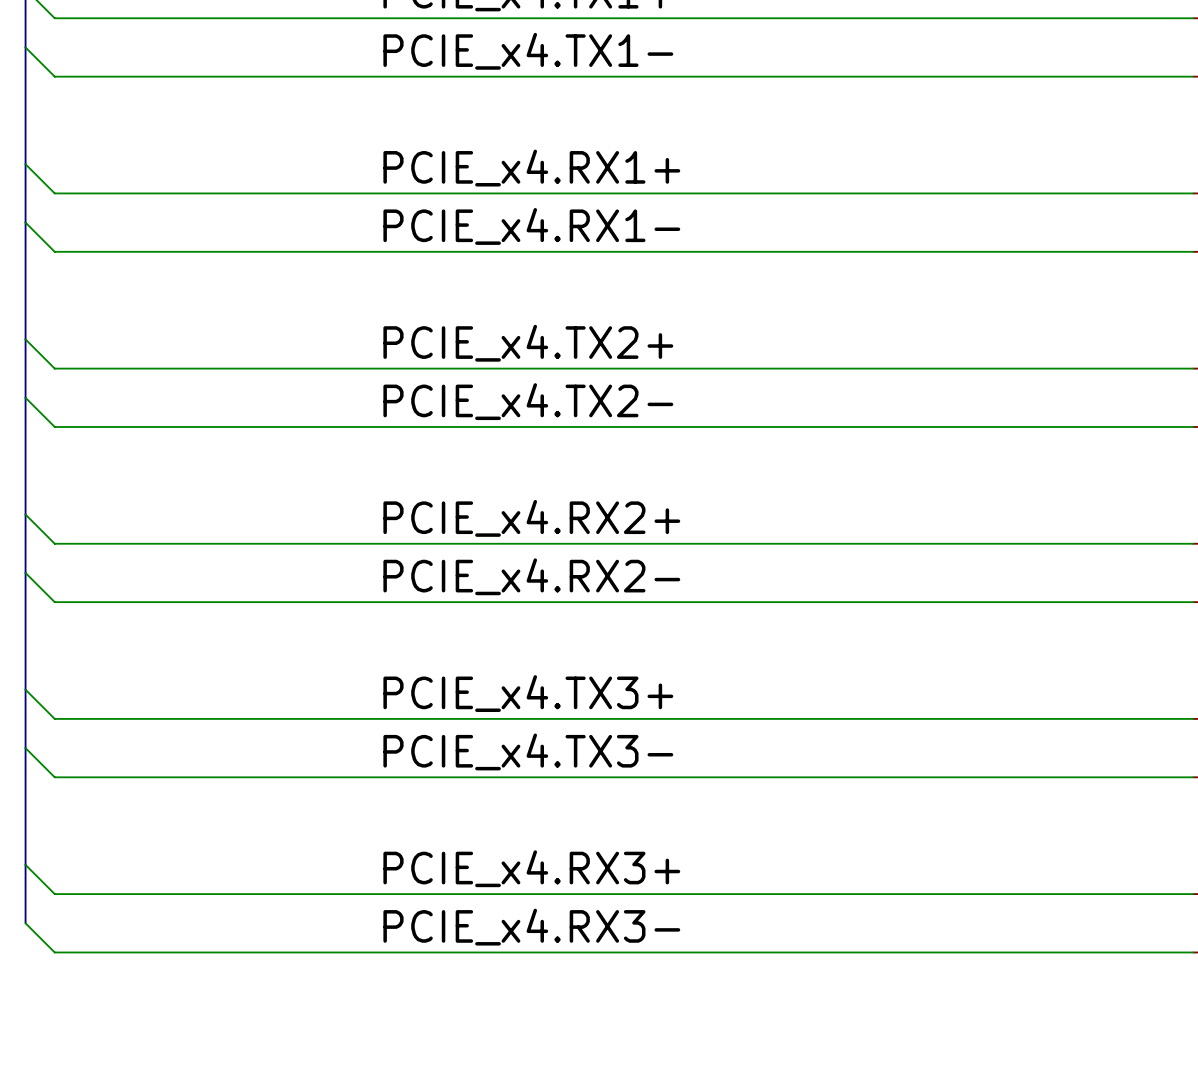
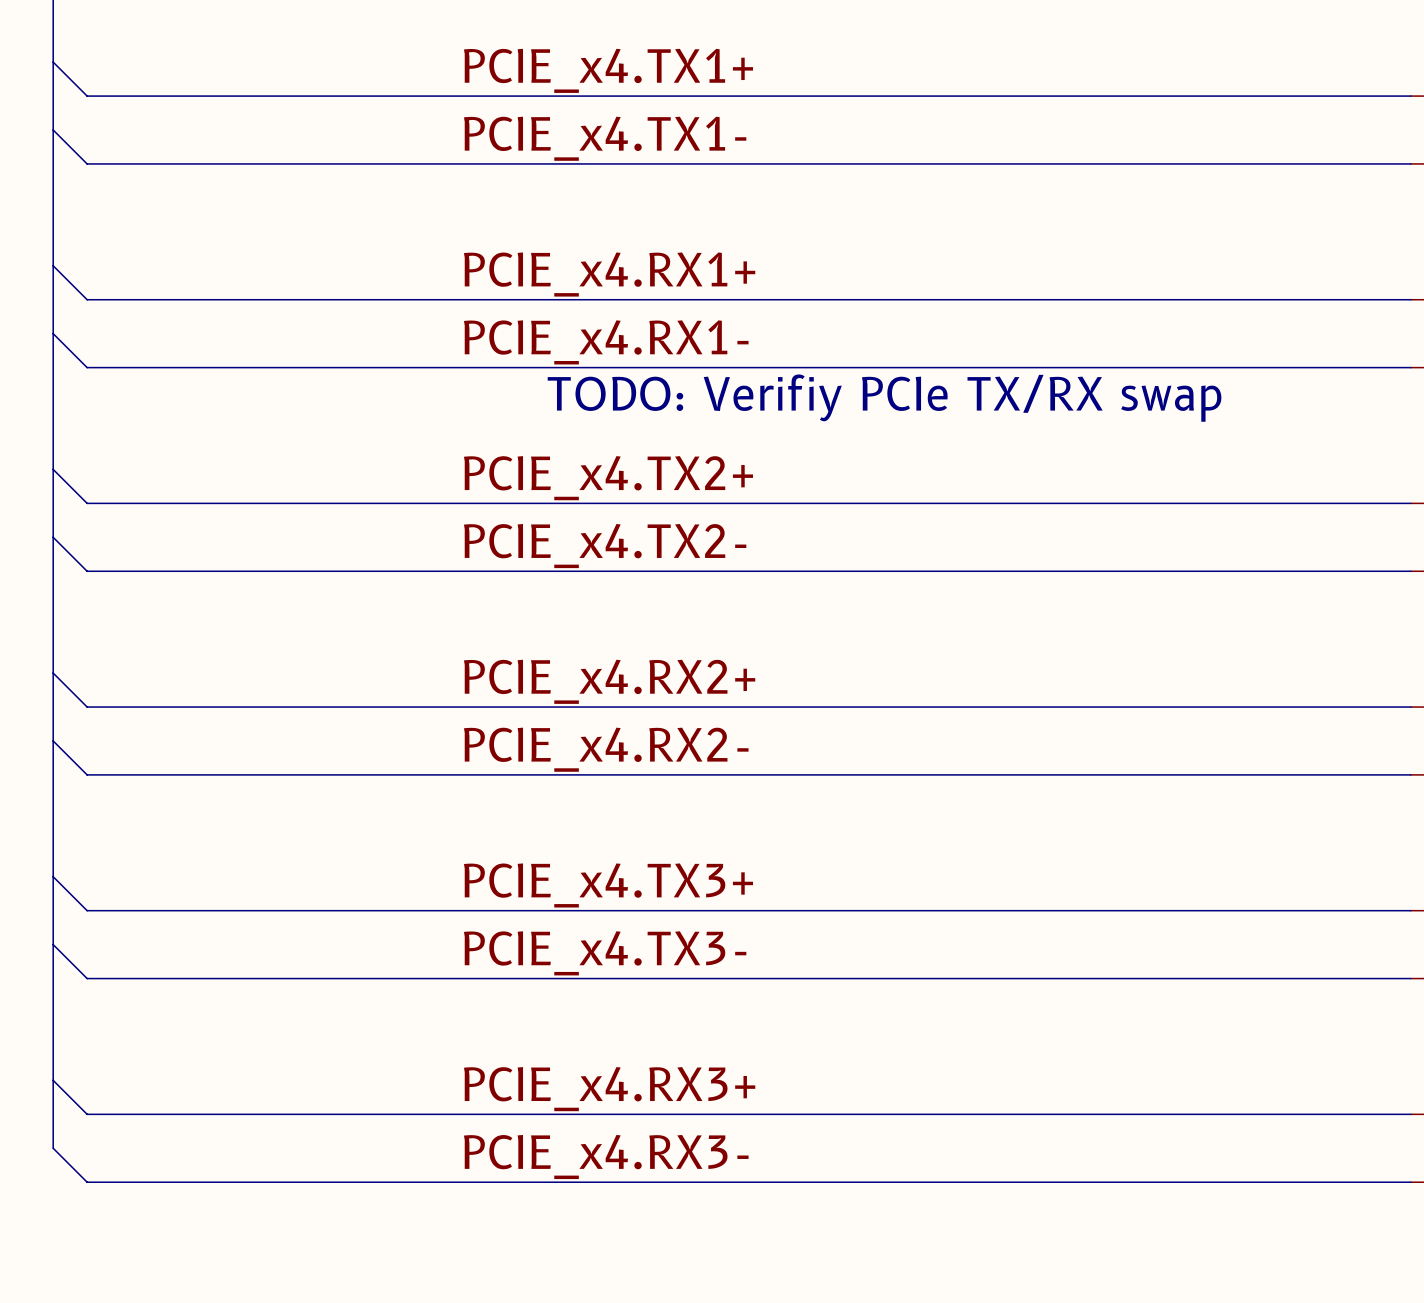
text: none -> TODO: Verifiy PCIe TX/RX swap (884, 398)

